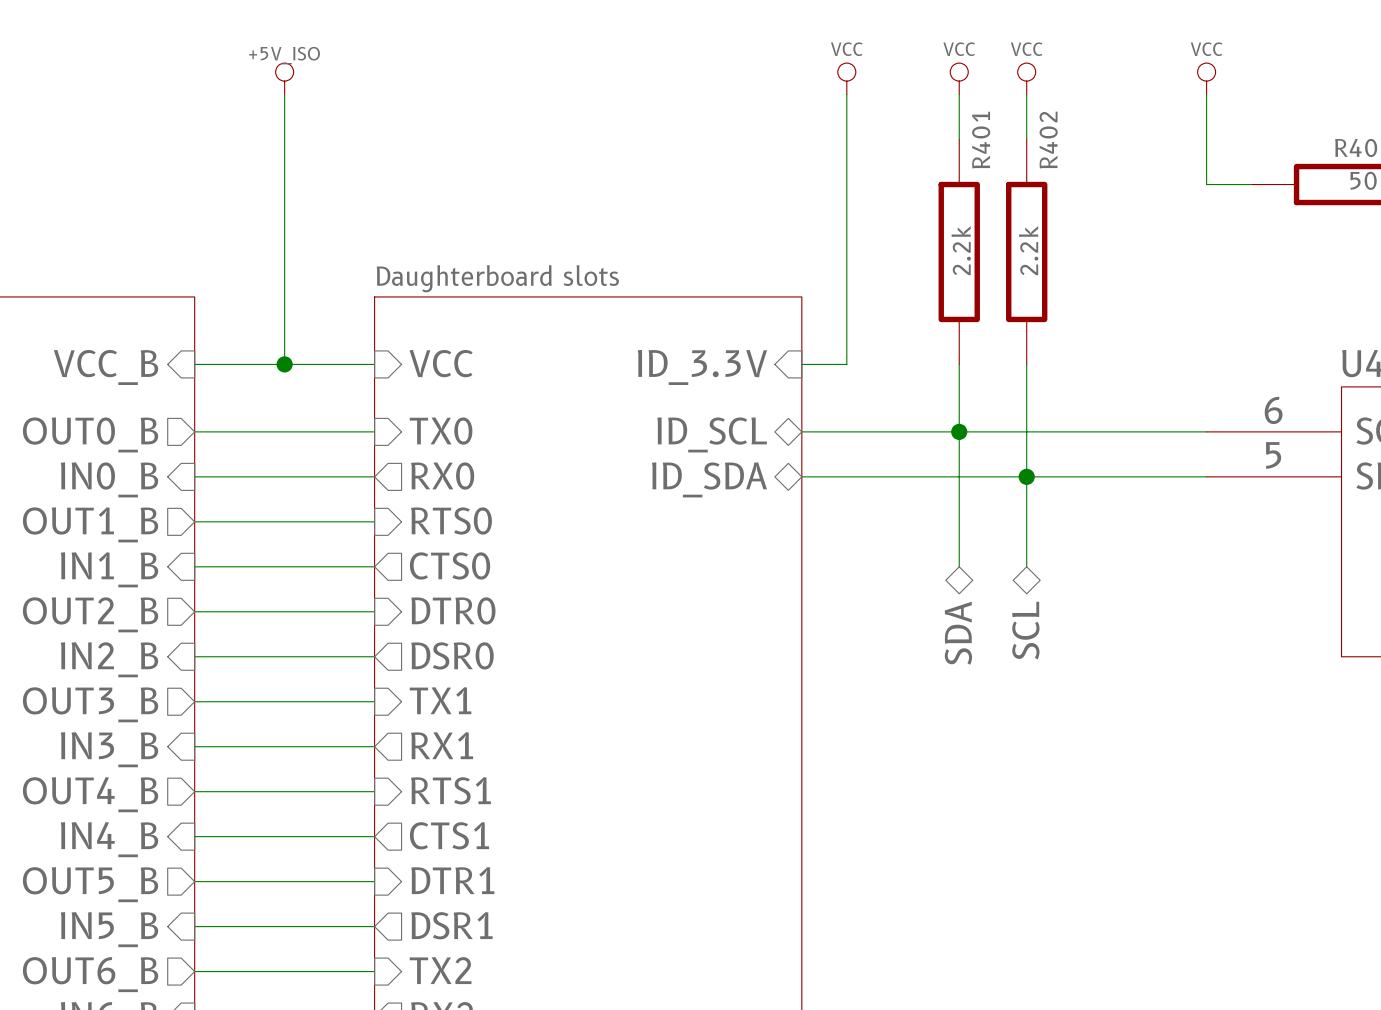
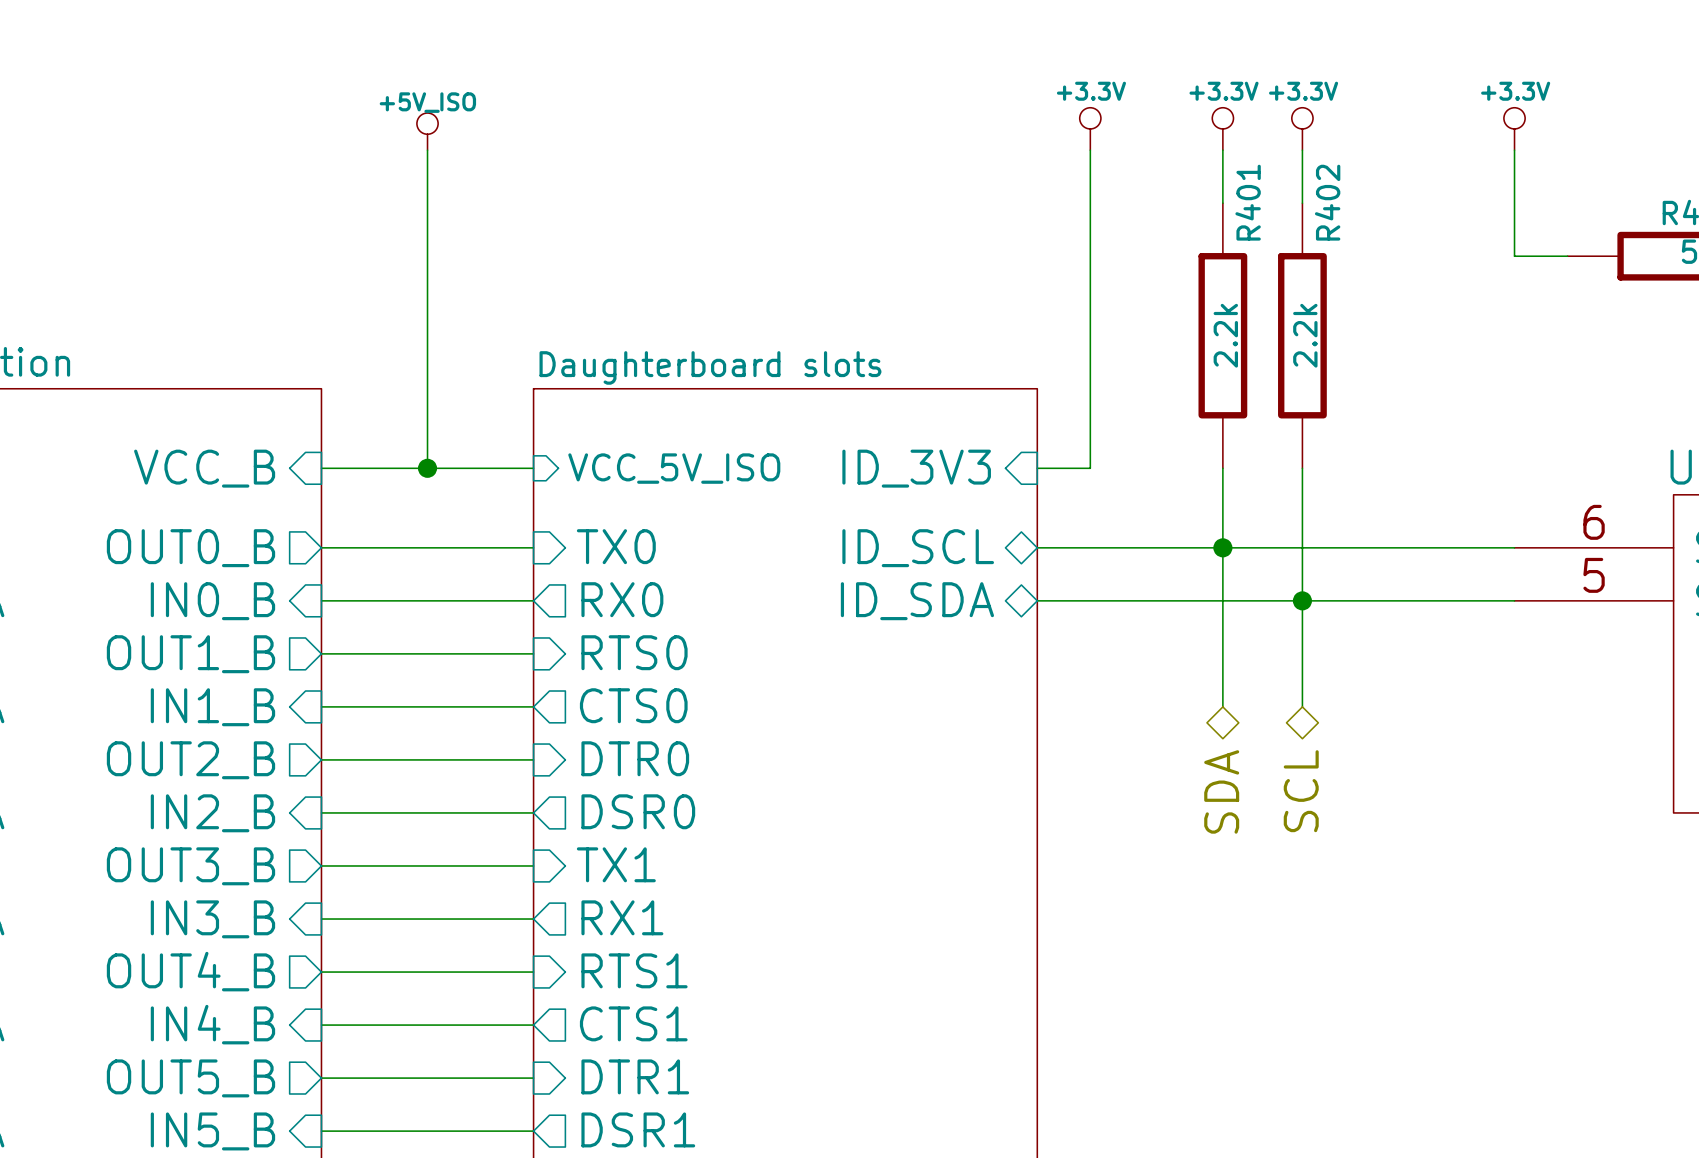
power symbol: VCC (846, 78) -> +3.3V (1090, 128)
power symbol: VCC (959, 78) -> +3.3V (1222, 128)
power symbol: VCC (1026, 78) -> +3.3V (1302, 128)
power symbol: VCC (1206, 78) -> +3.3V (1514, 128)
sheet pin: VCC (441, 363) -> VCC_5V_ISO (674, 468)
sheet pin: ID_3.3V (702, 367) -> ID_3V3 (916, 468)

